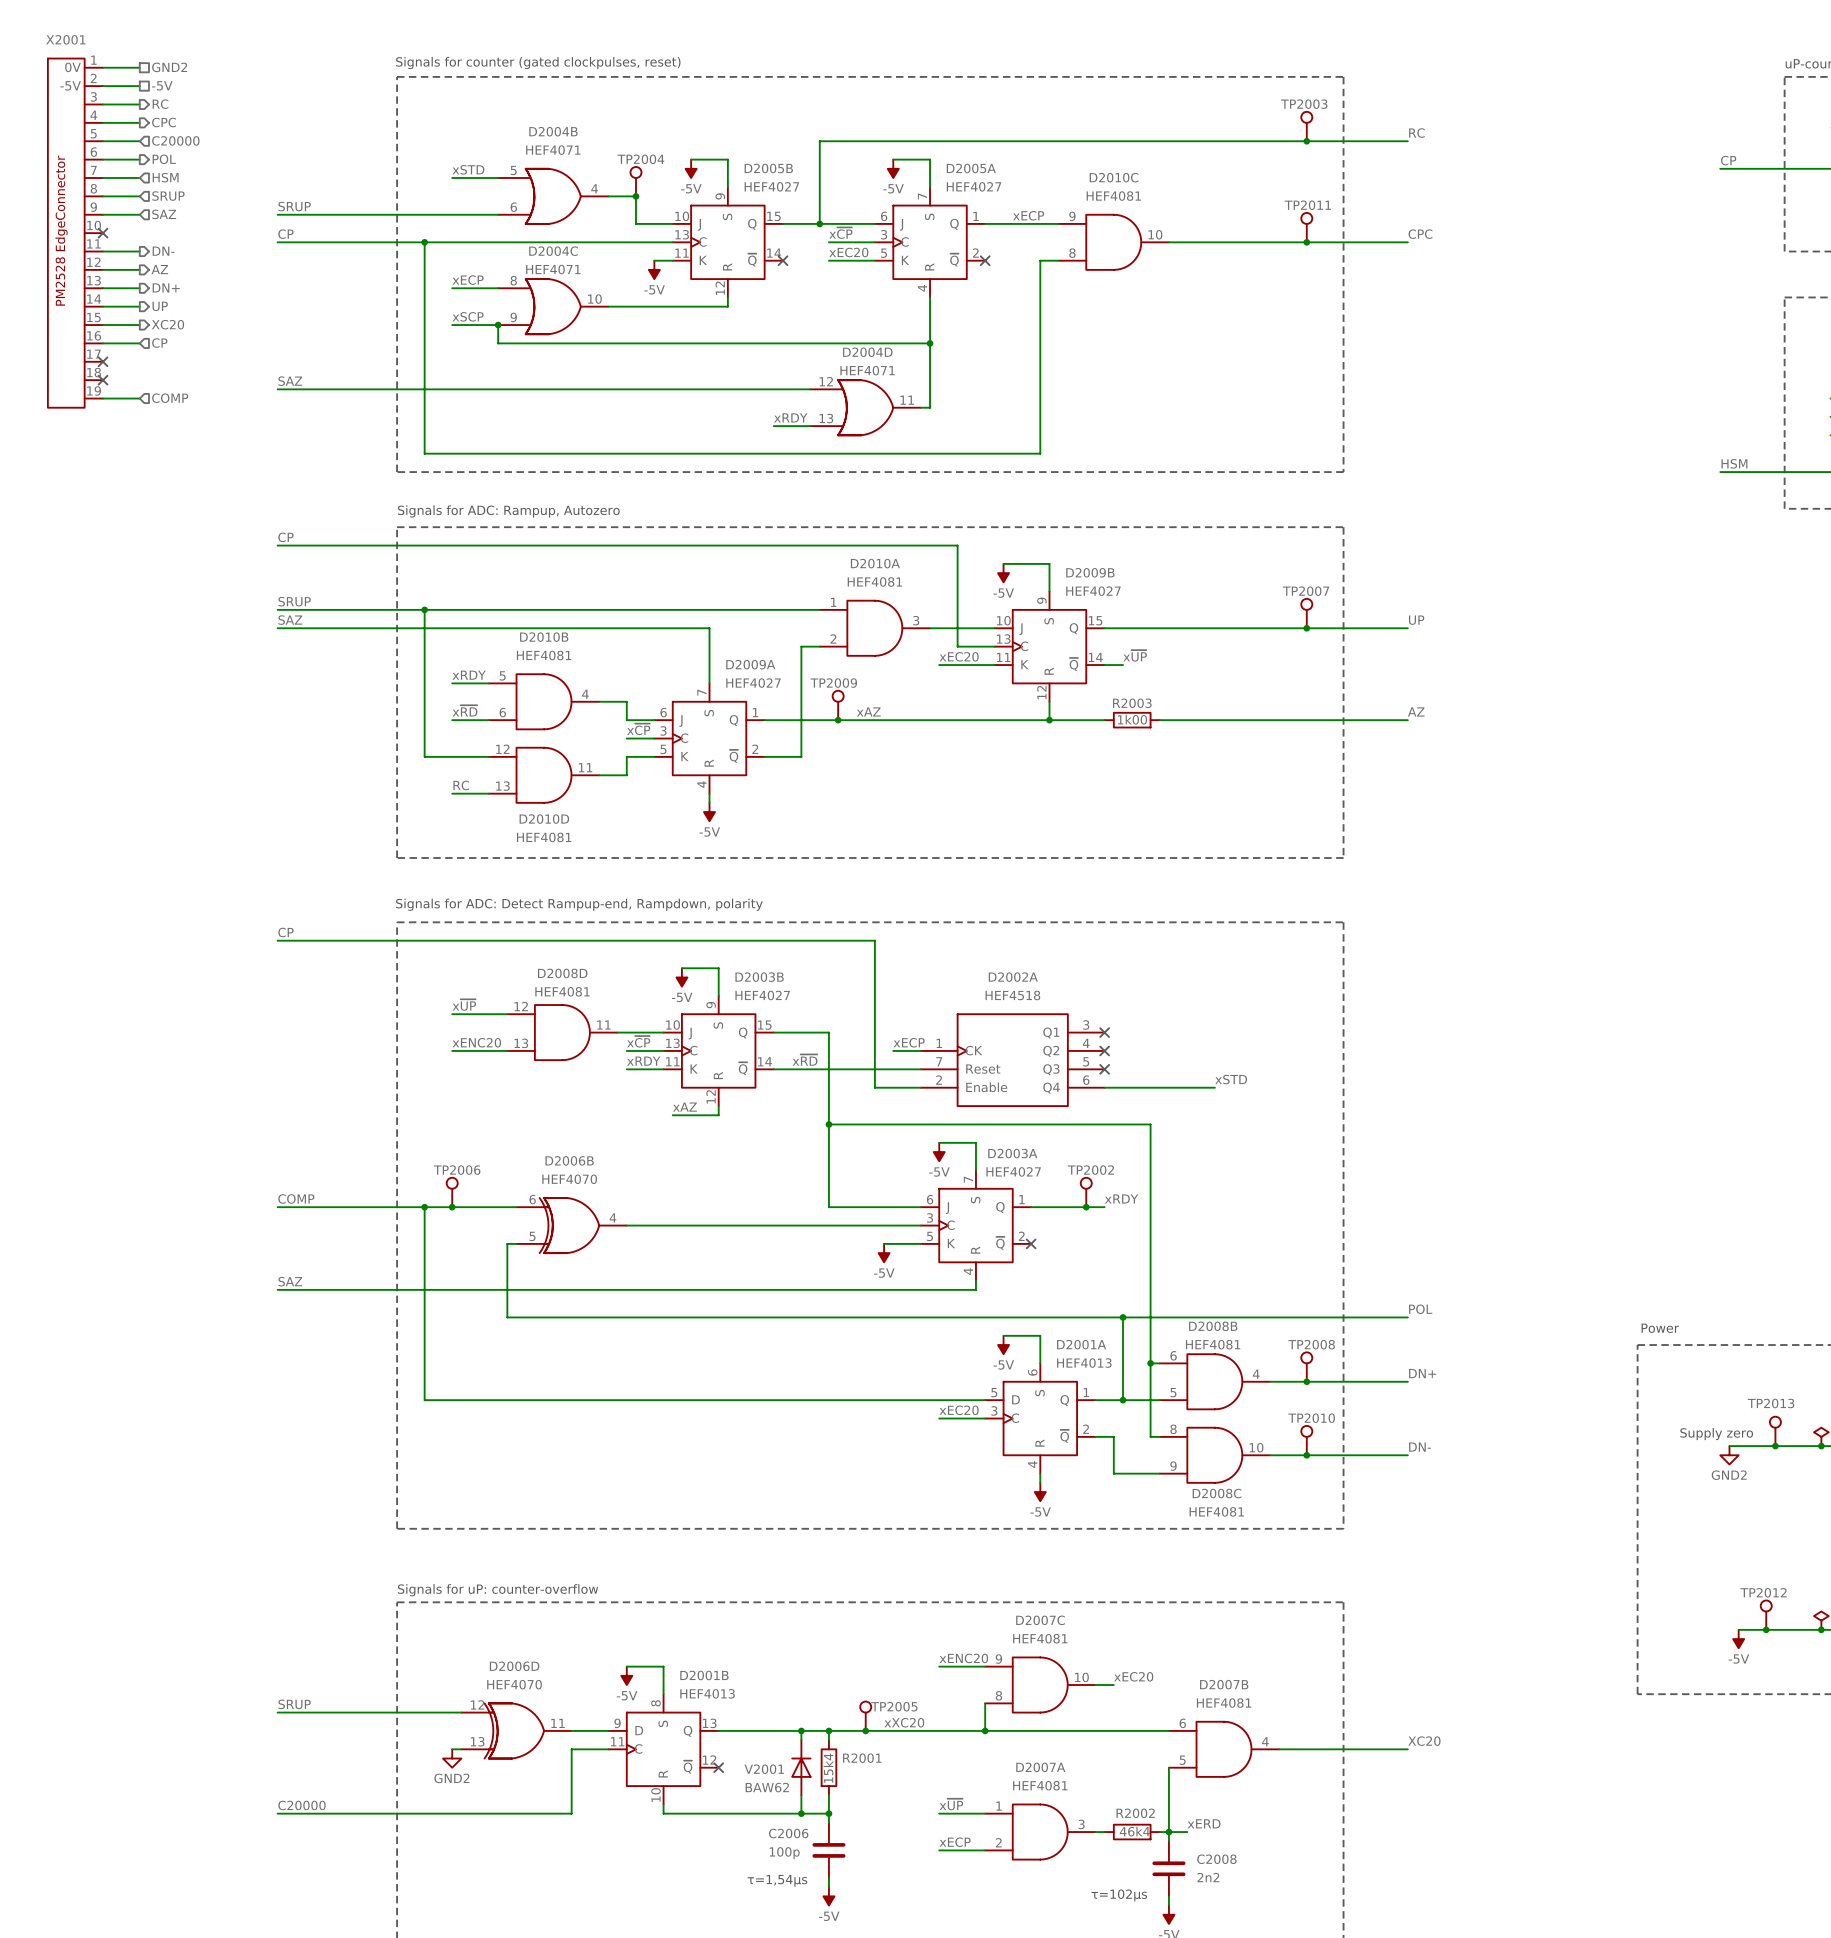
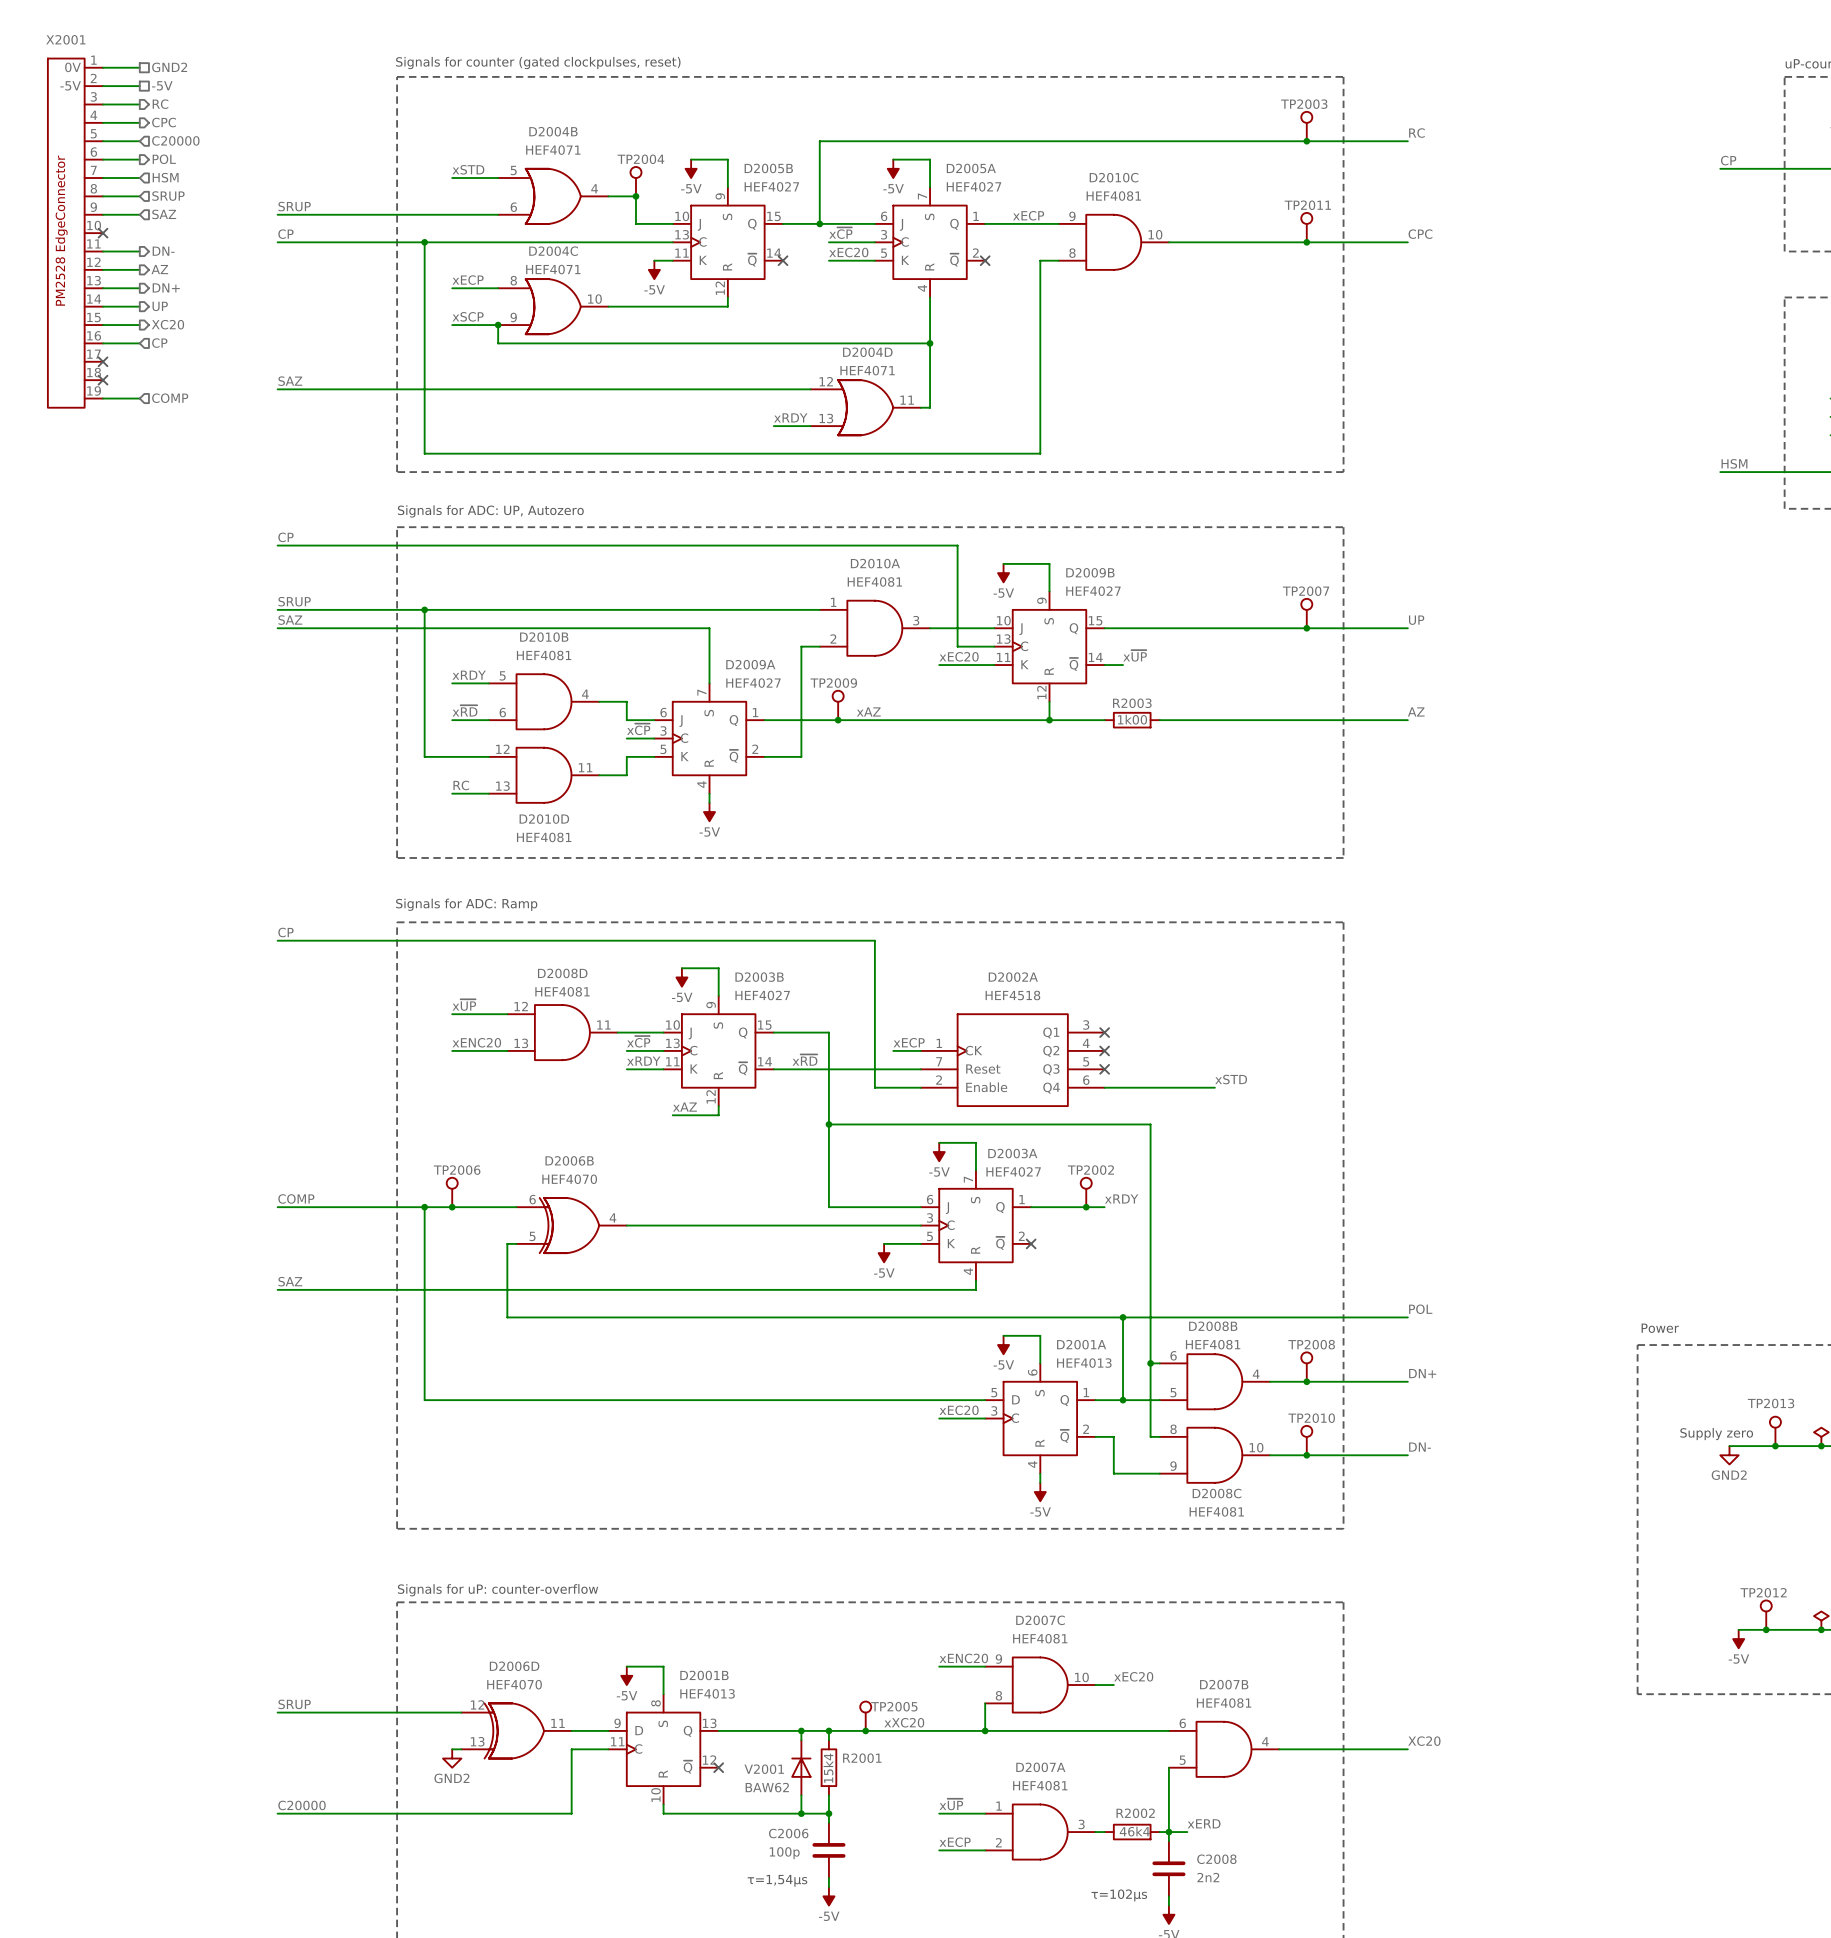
text: Signals for ADC: Rampup, Autozero (508, 511) -> Signals for ADC: UP, Autozero (490, 511)
text: Signals for ADC: Detect Rampup-end, Rampdown, polarity (579, 904) -> Signals for ADC: Ramp (466, 904)

